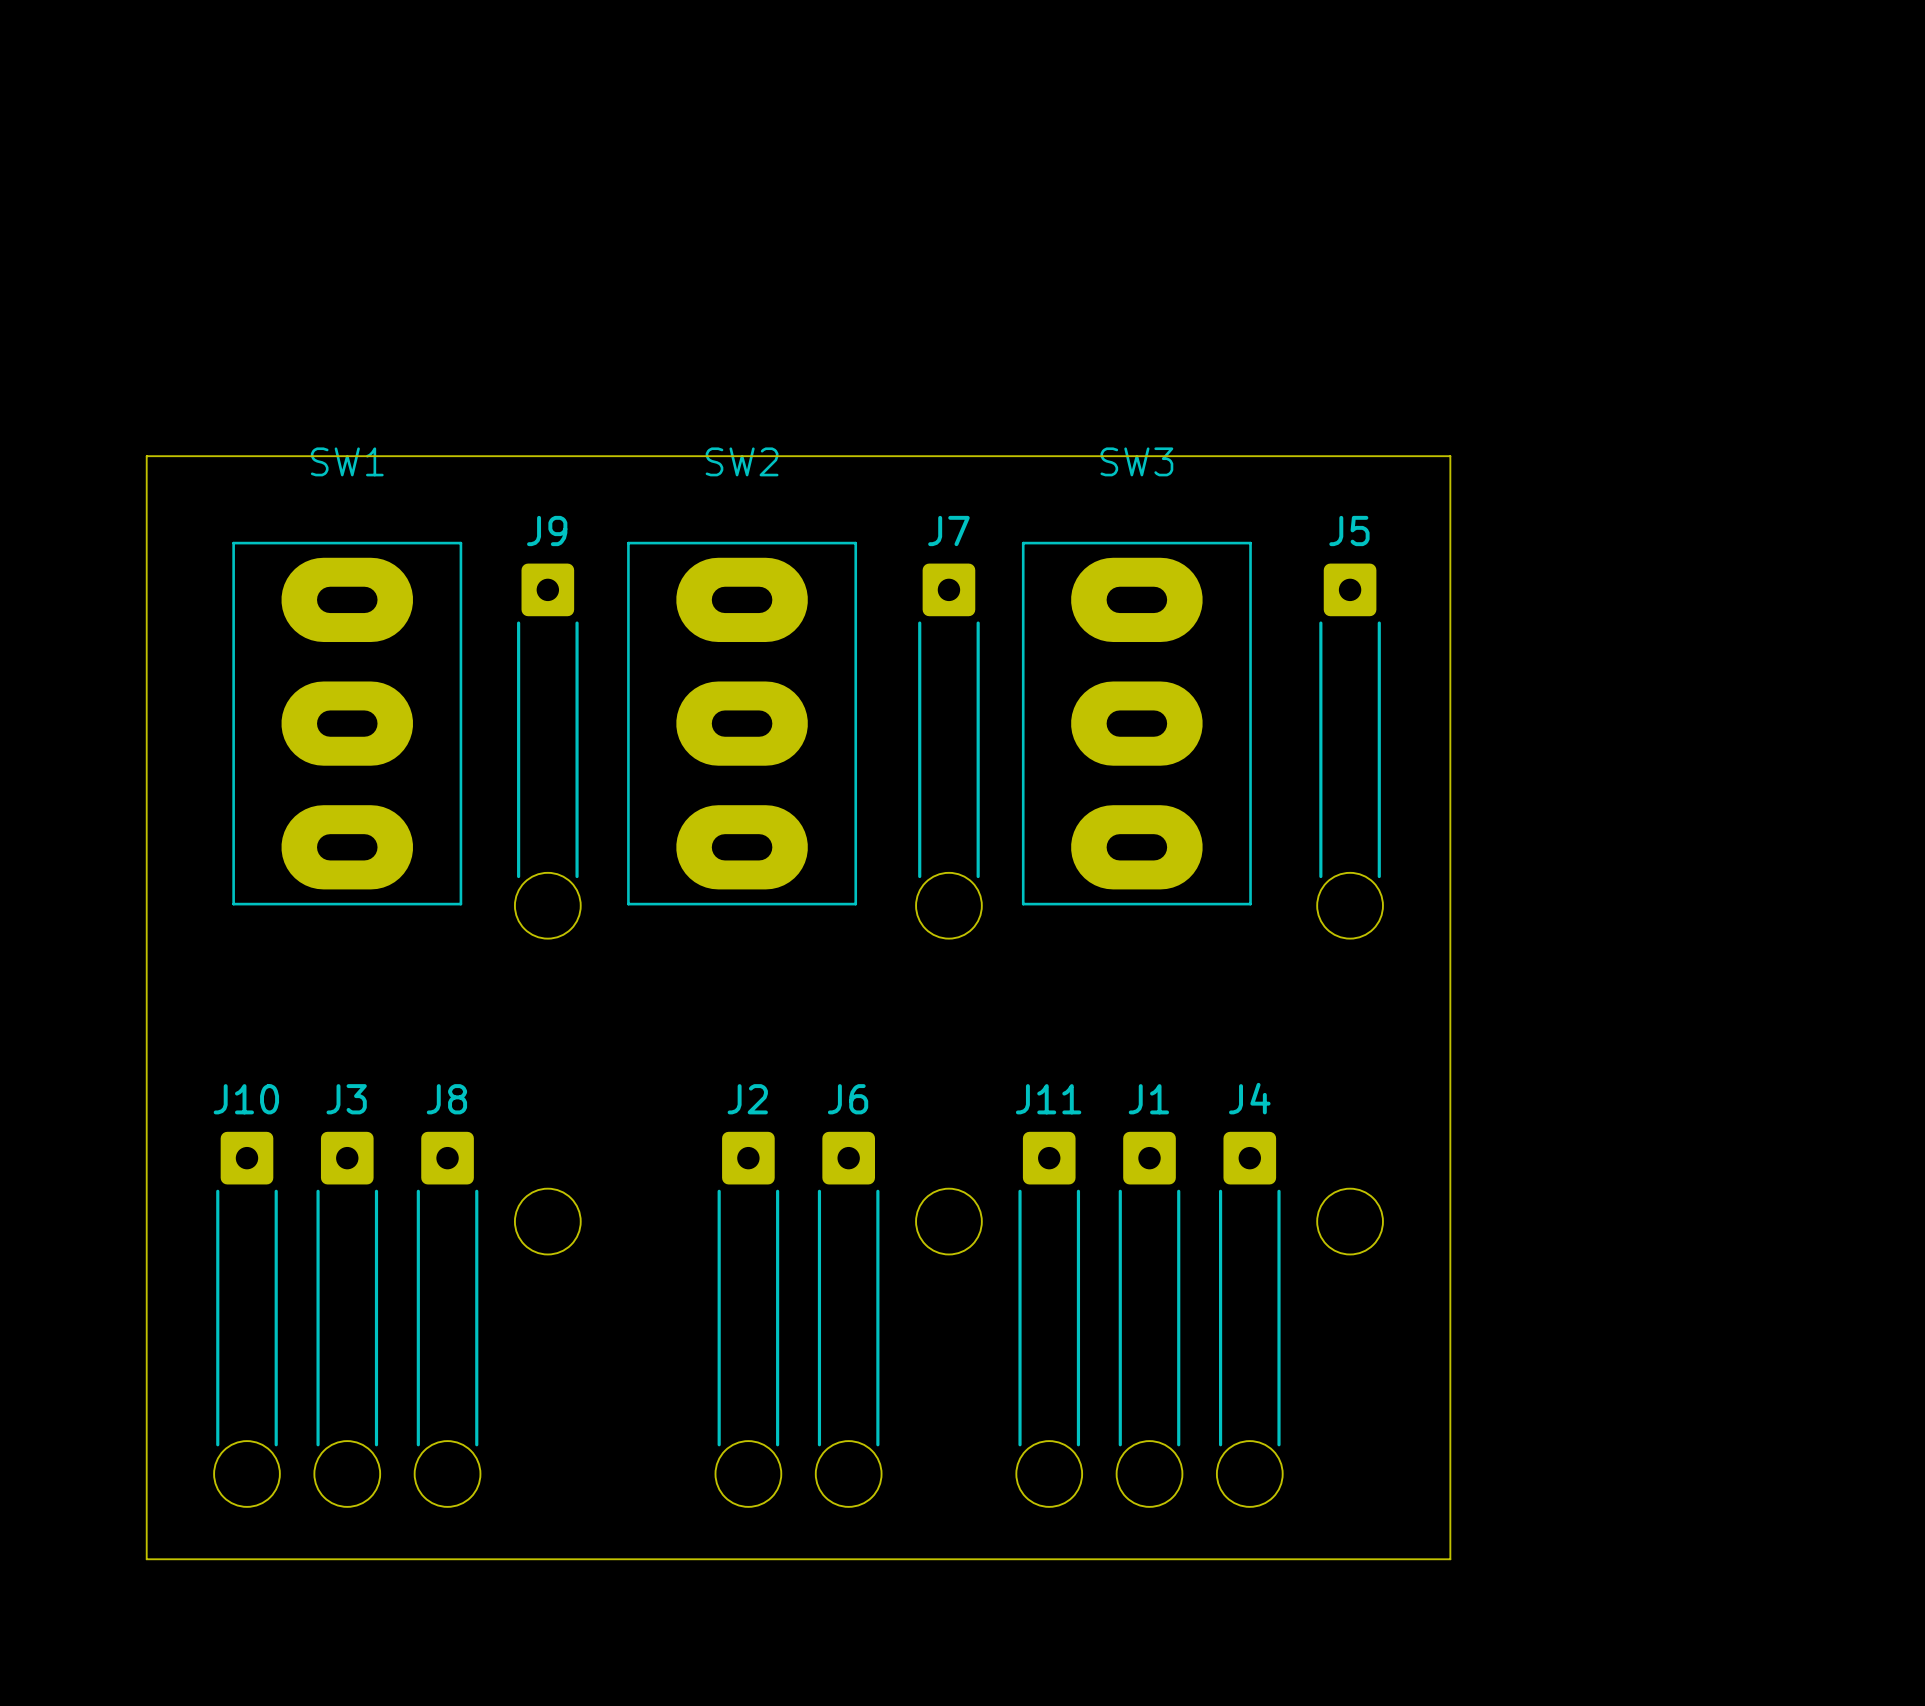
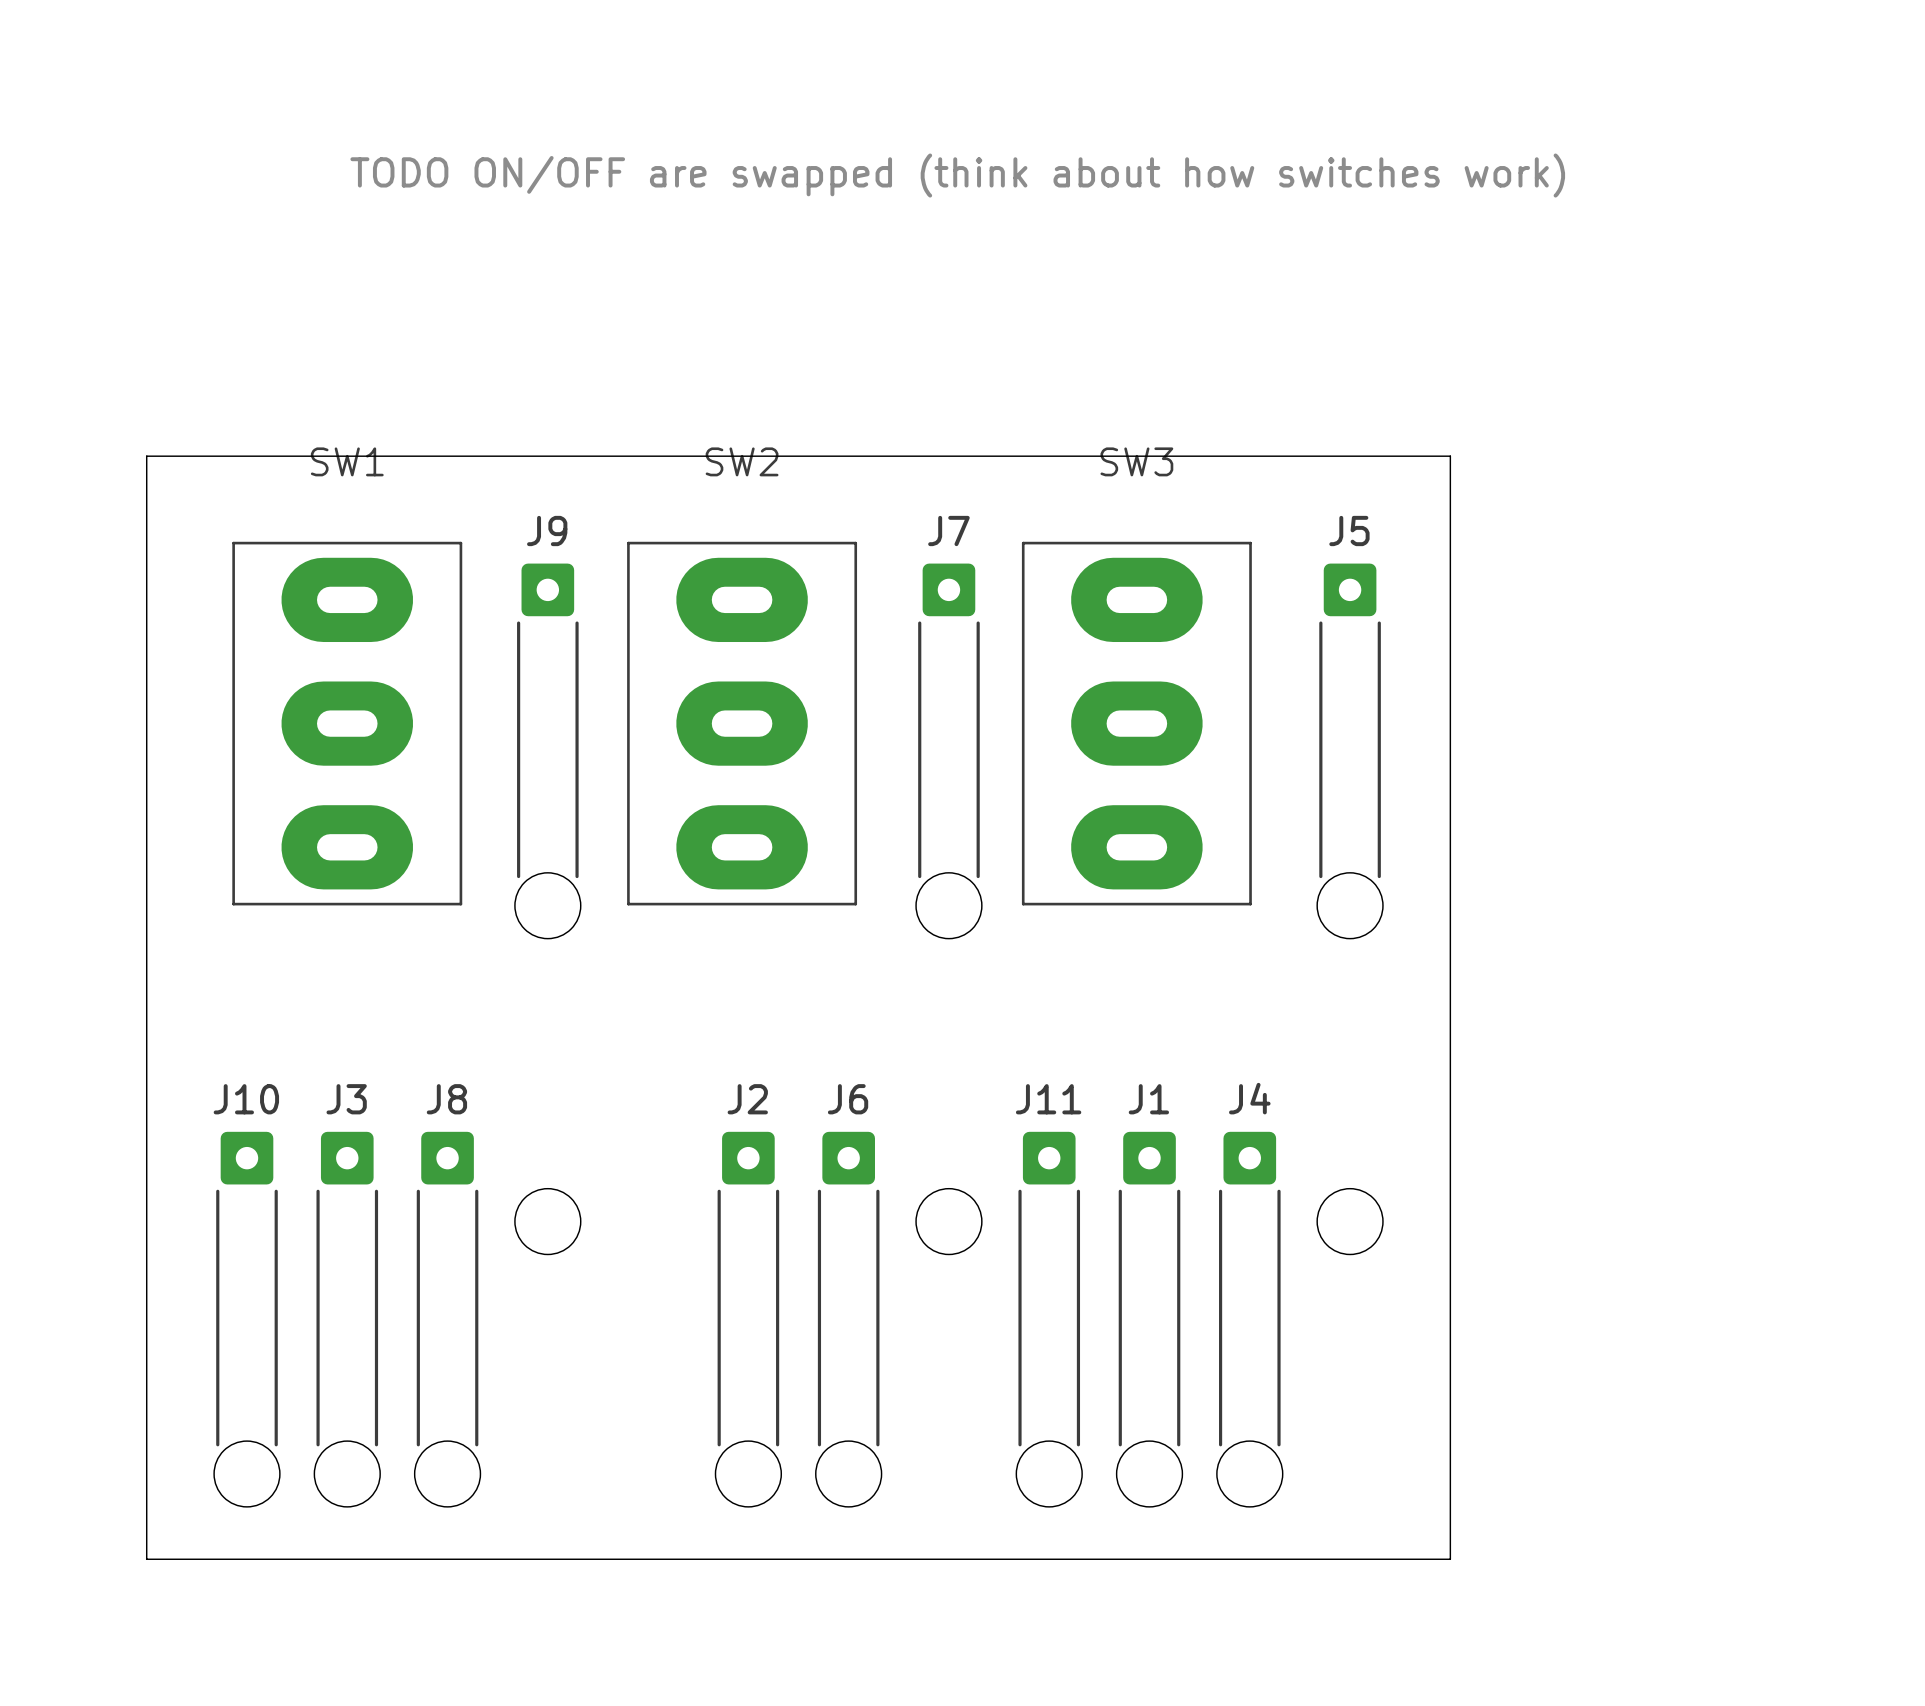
text: none -> TODO ON/OFF are swapped (think about how switches work) (957, 175)

